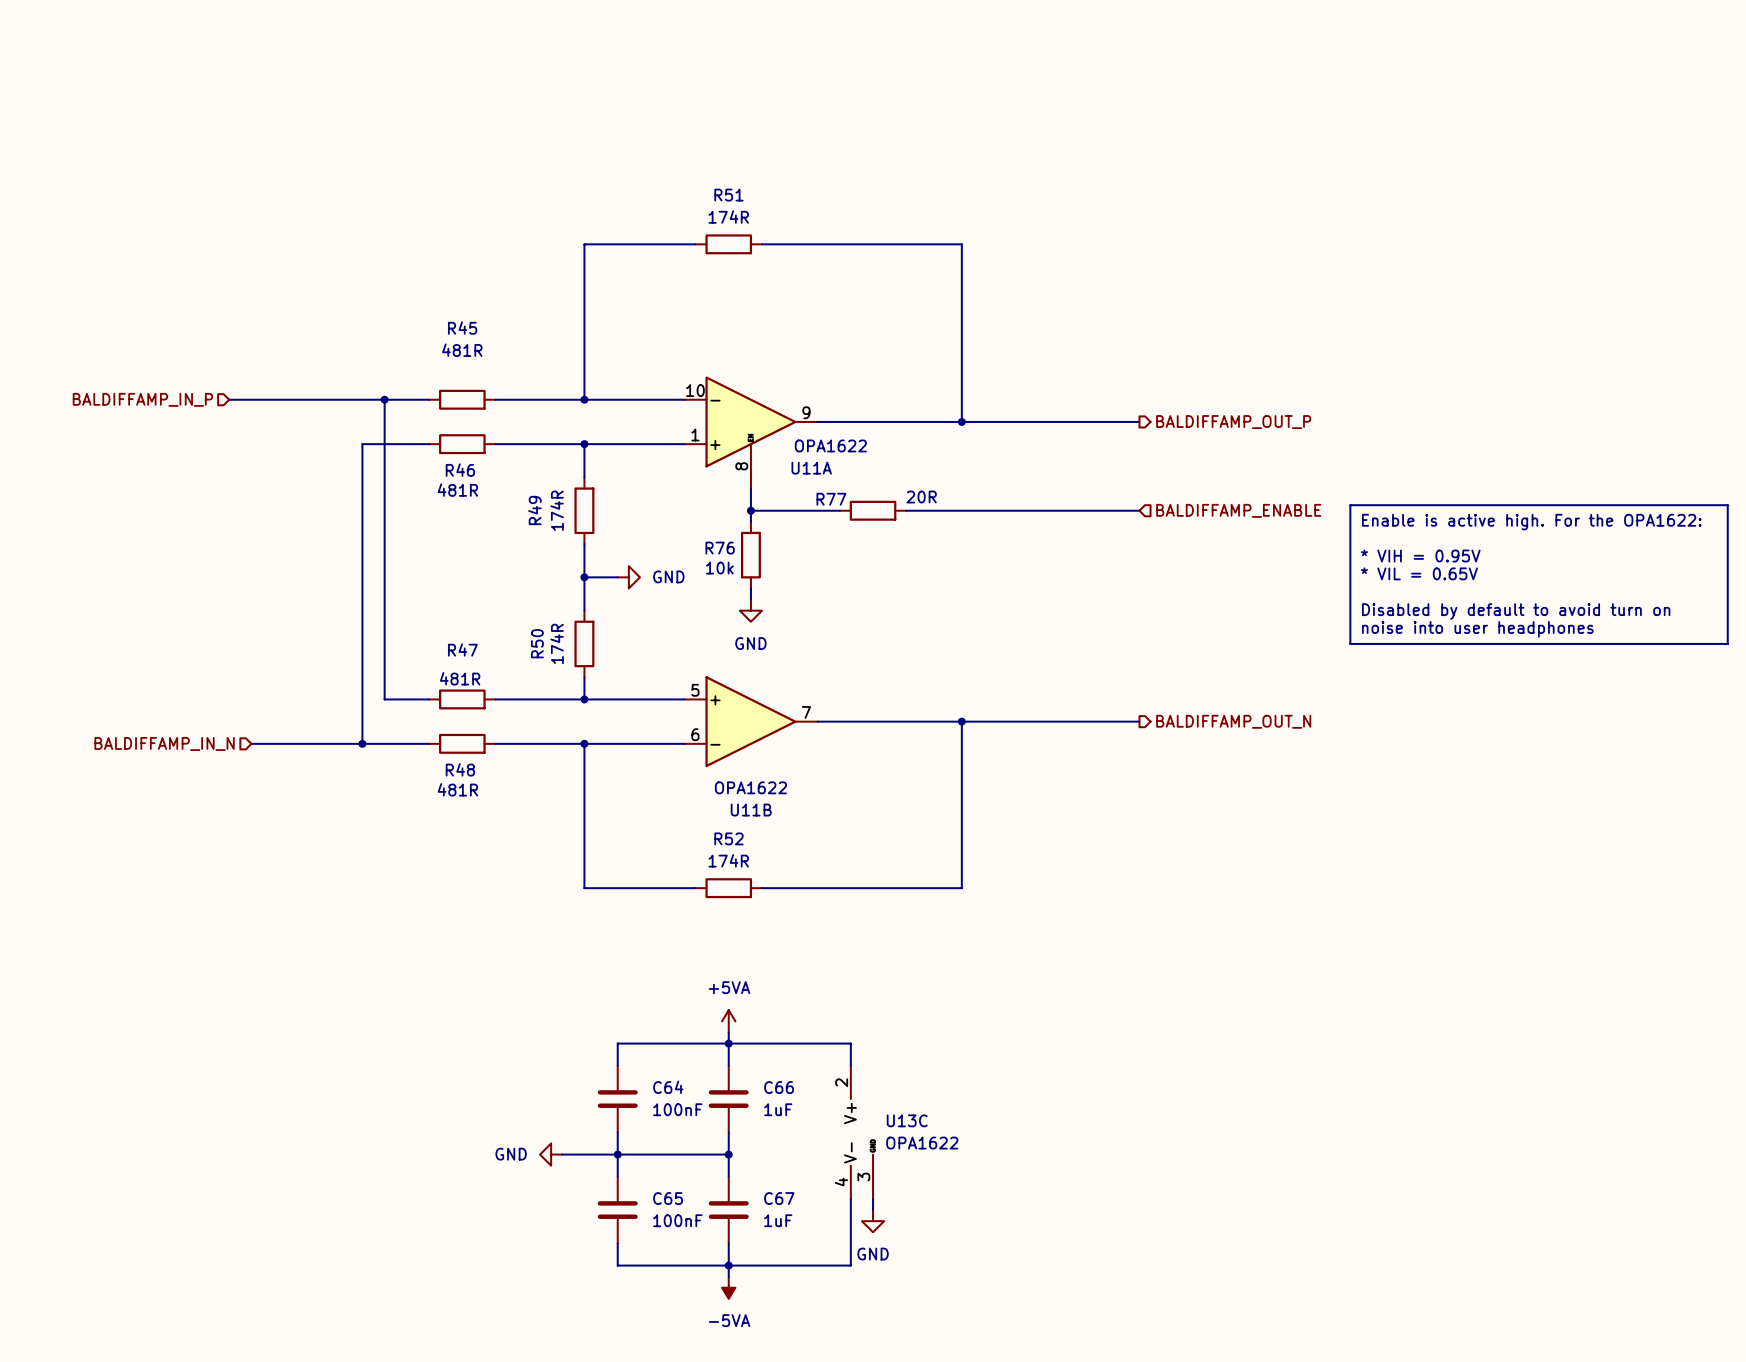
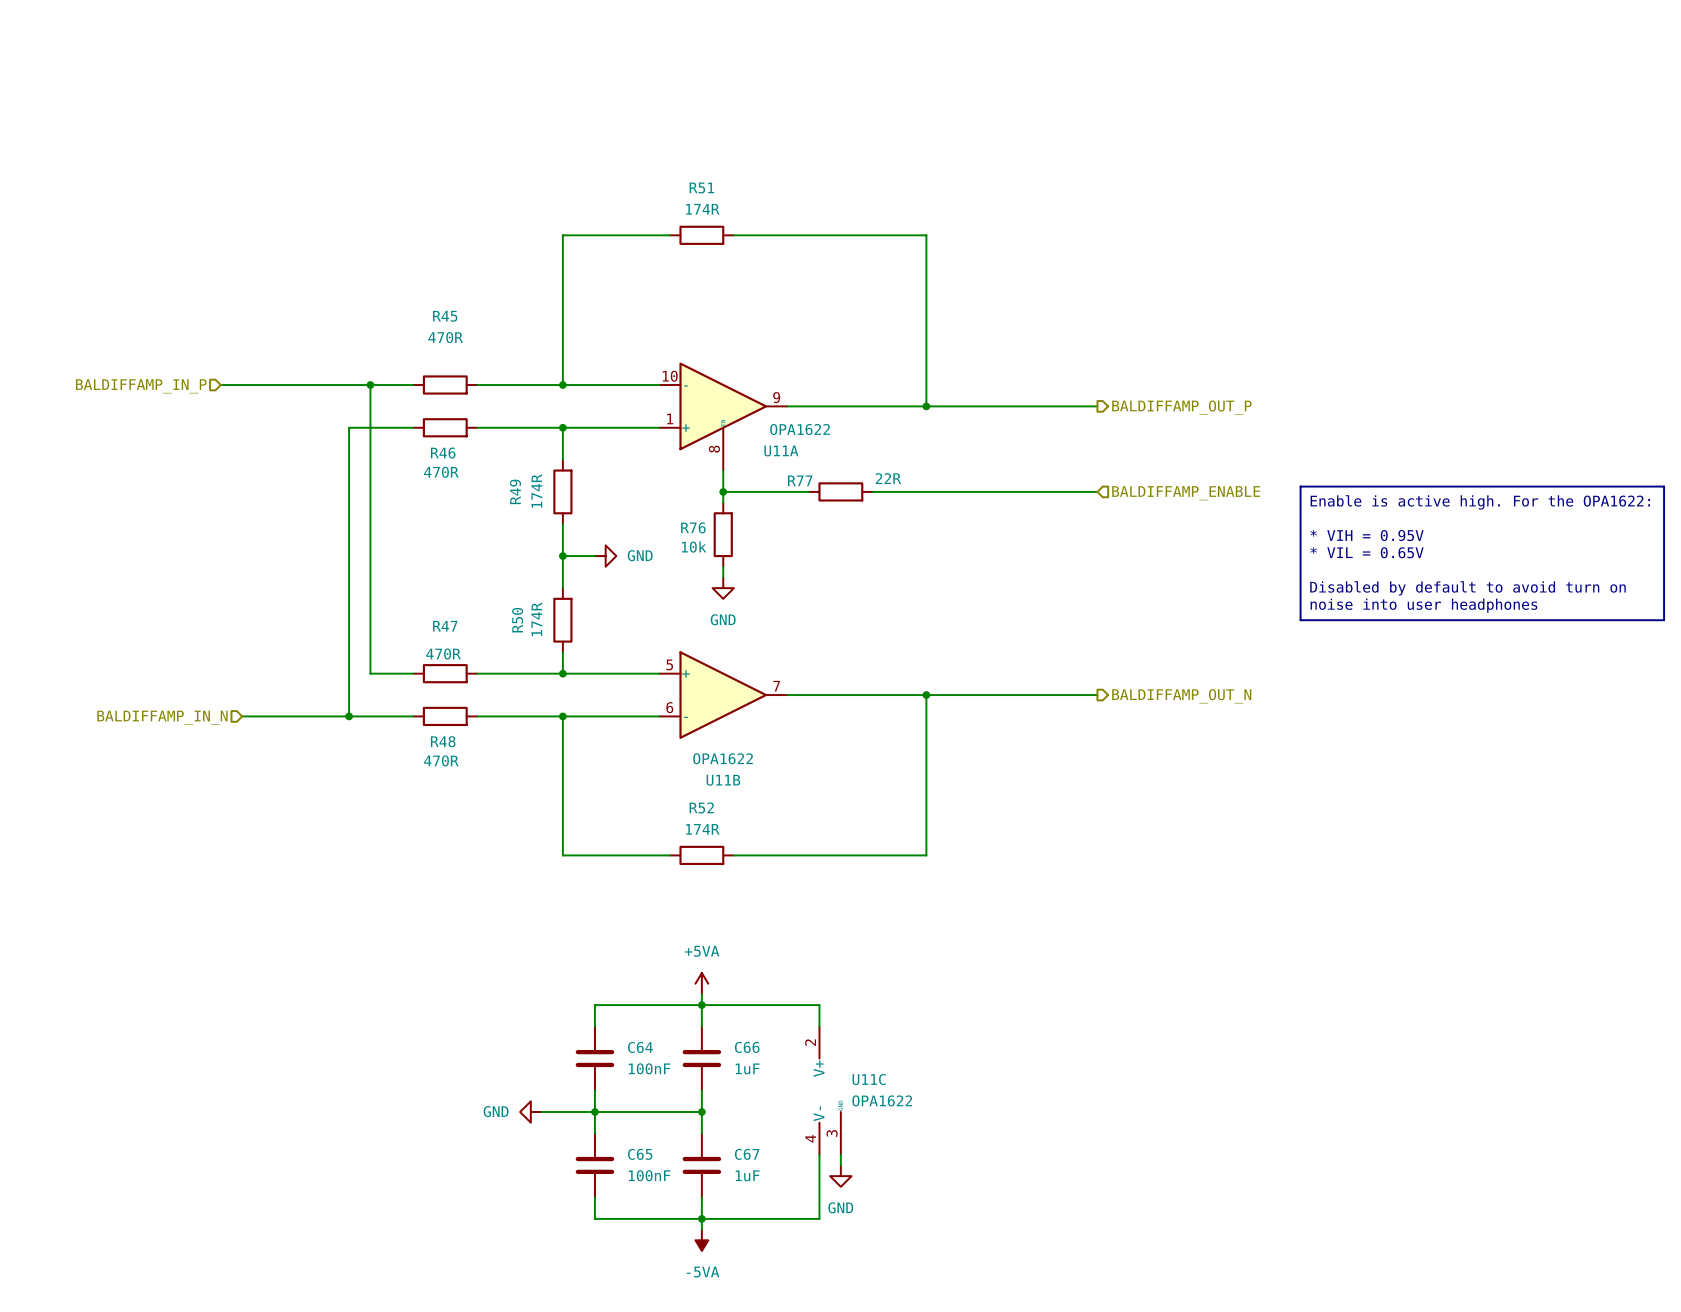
R45 value: 481R (462, 350) -> 470R (445, 337)
R46 value: 481R (457, 490) -> 470R (441, 472)
R77 value: 20R (921, 497) -> 22R (888, 478)
R47 value: 481R (460, 678) -> 470R (443, 654)
R48 value: 481R (457, 789) -> 470R (441, 760)
U13C name: U13C (907, 1120) -> U11C (869, 1079)

